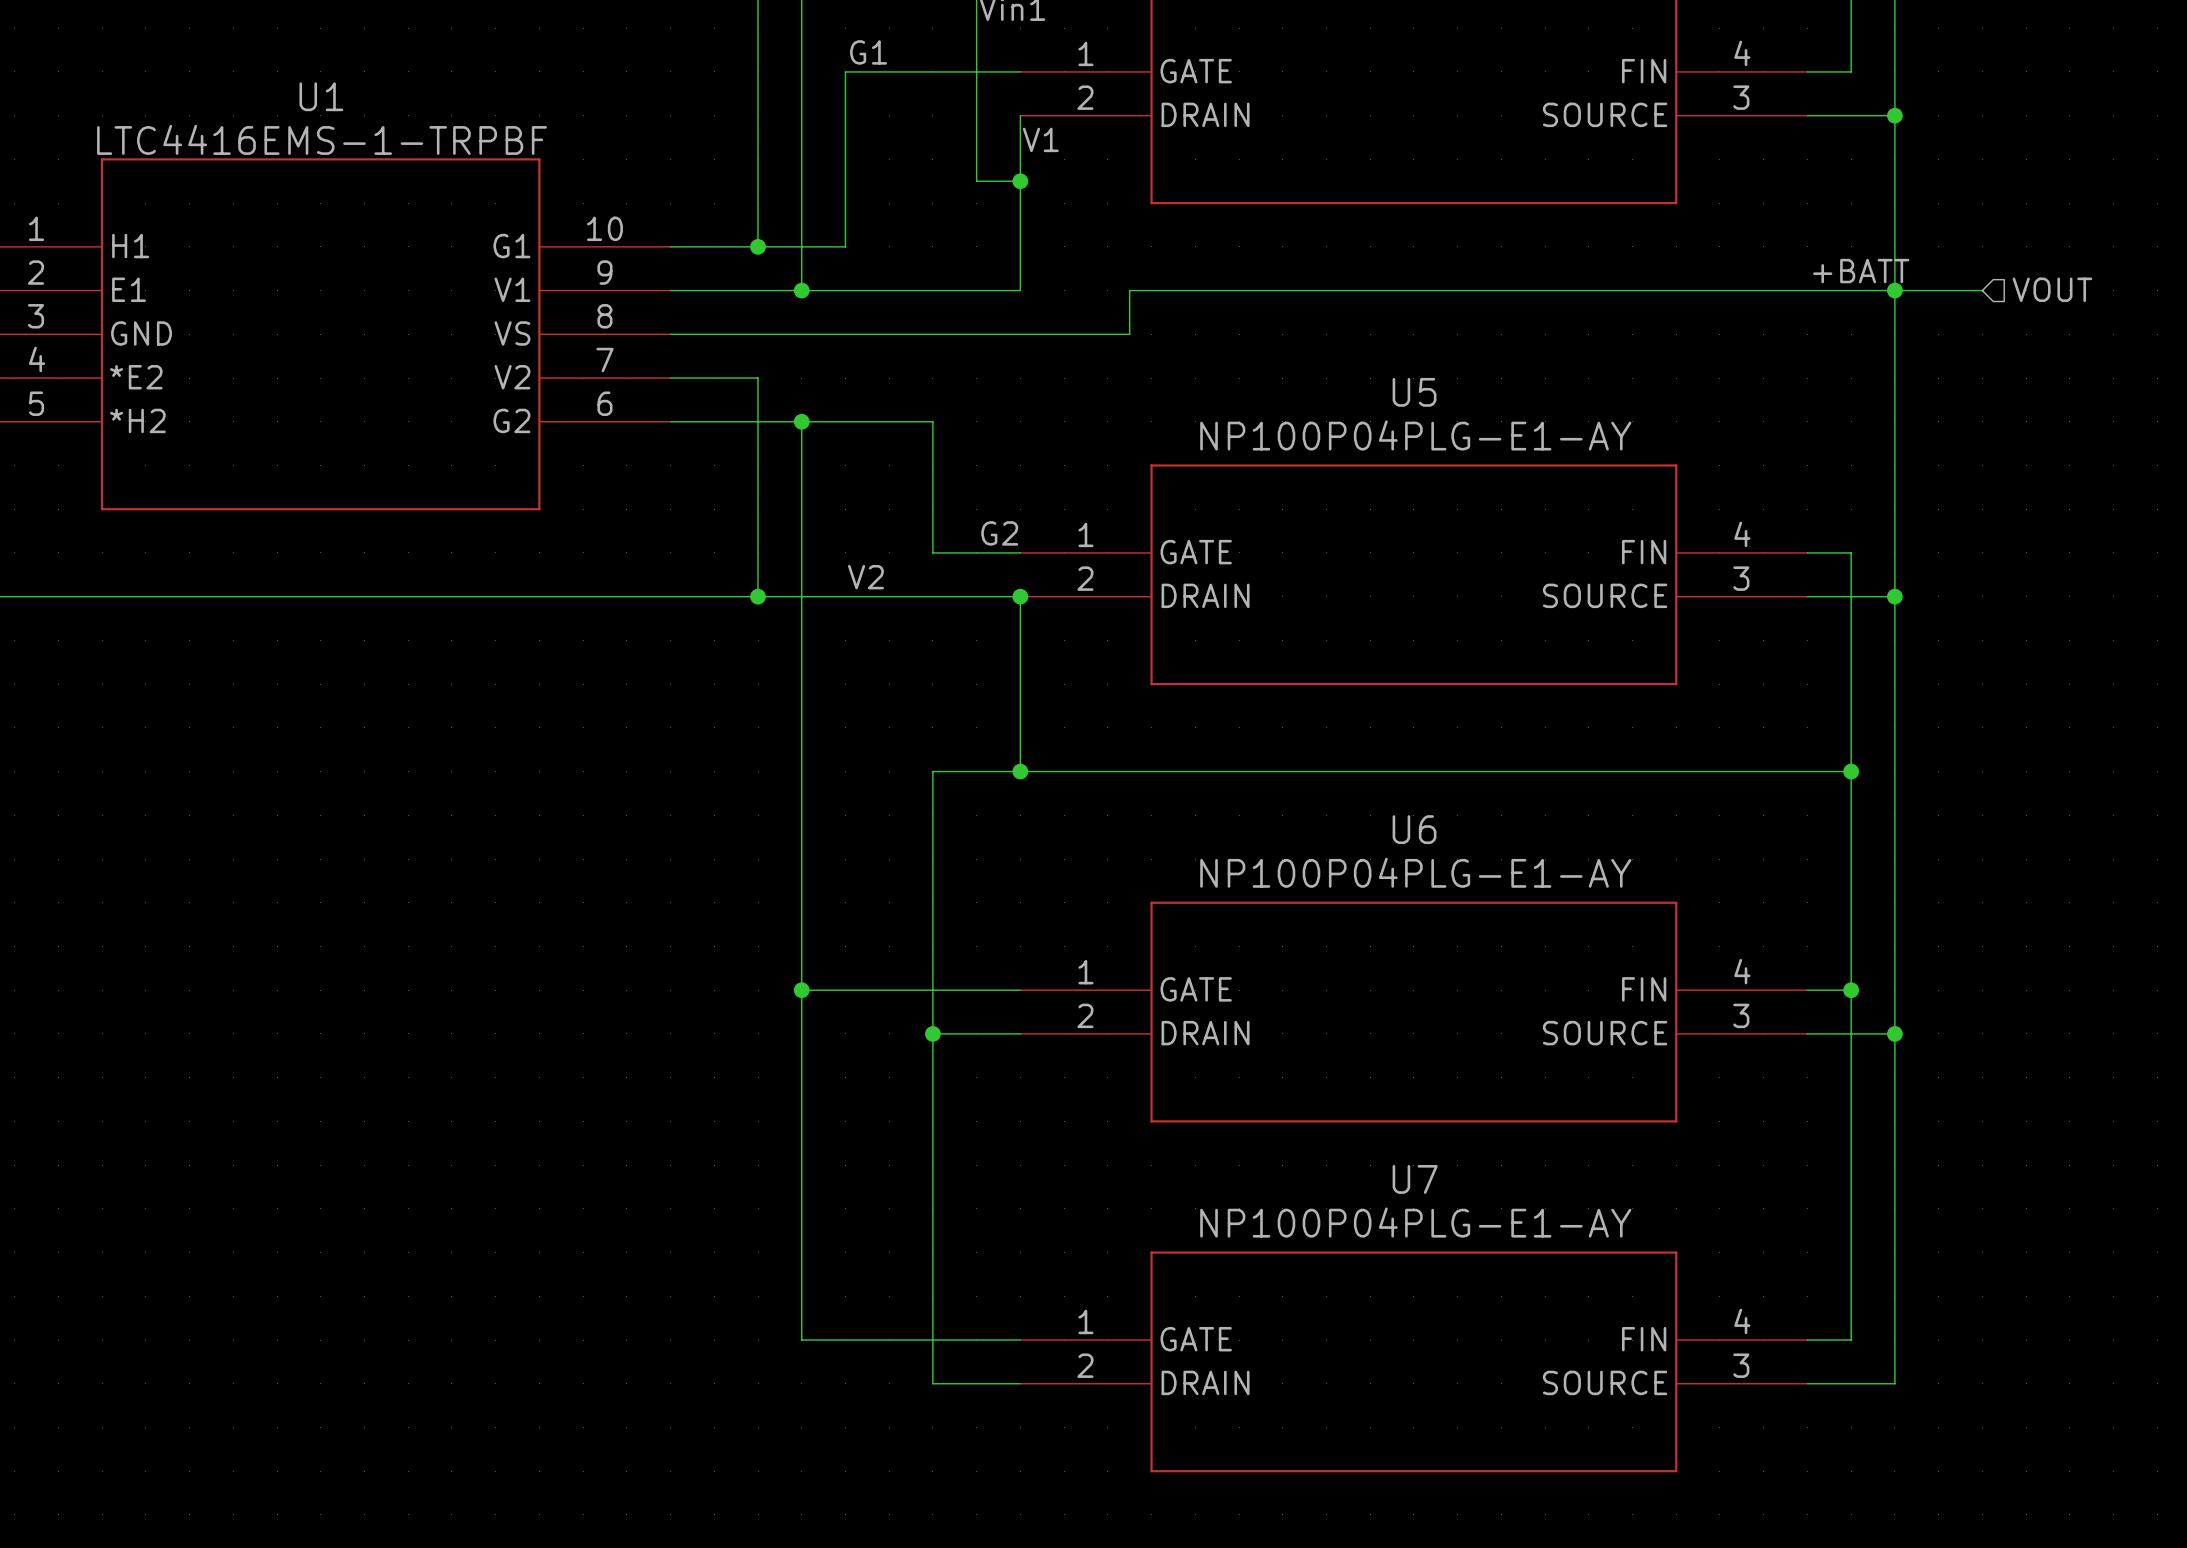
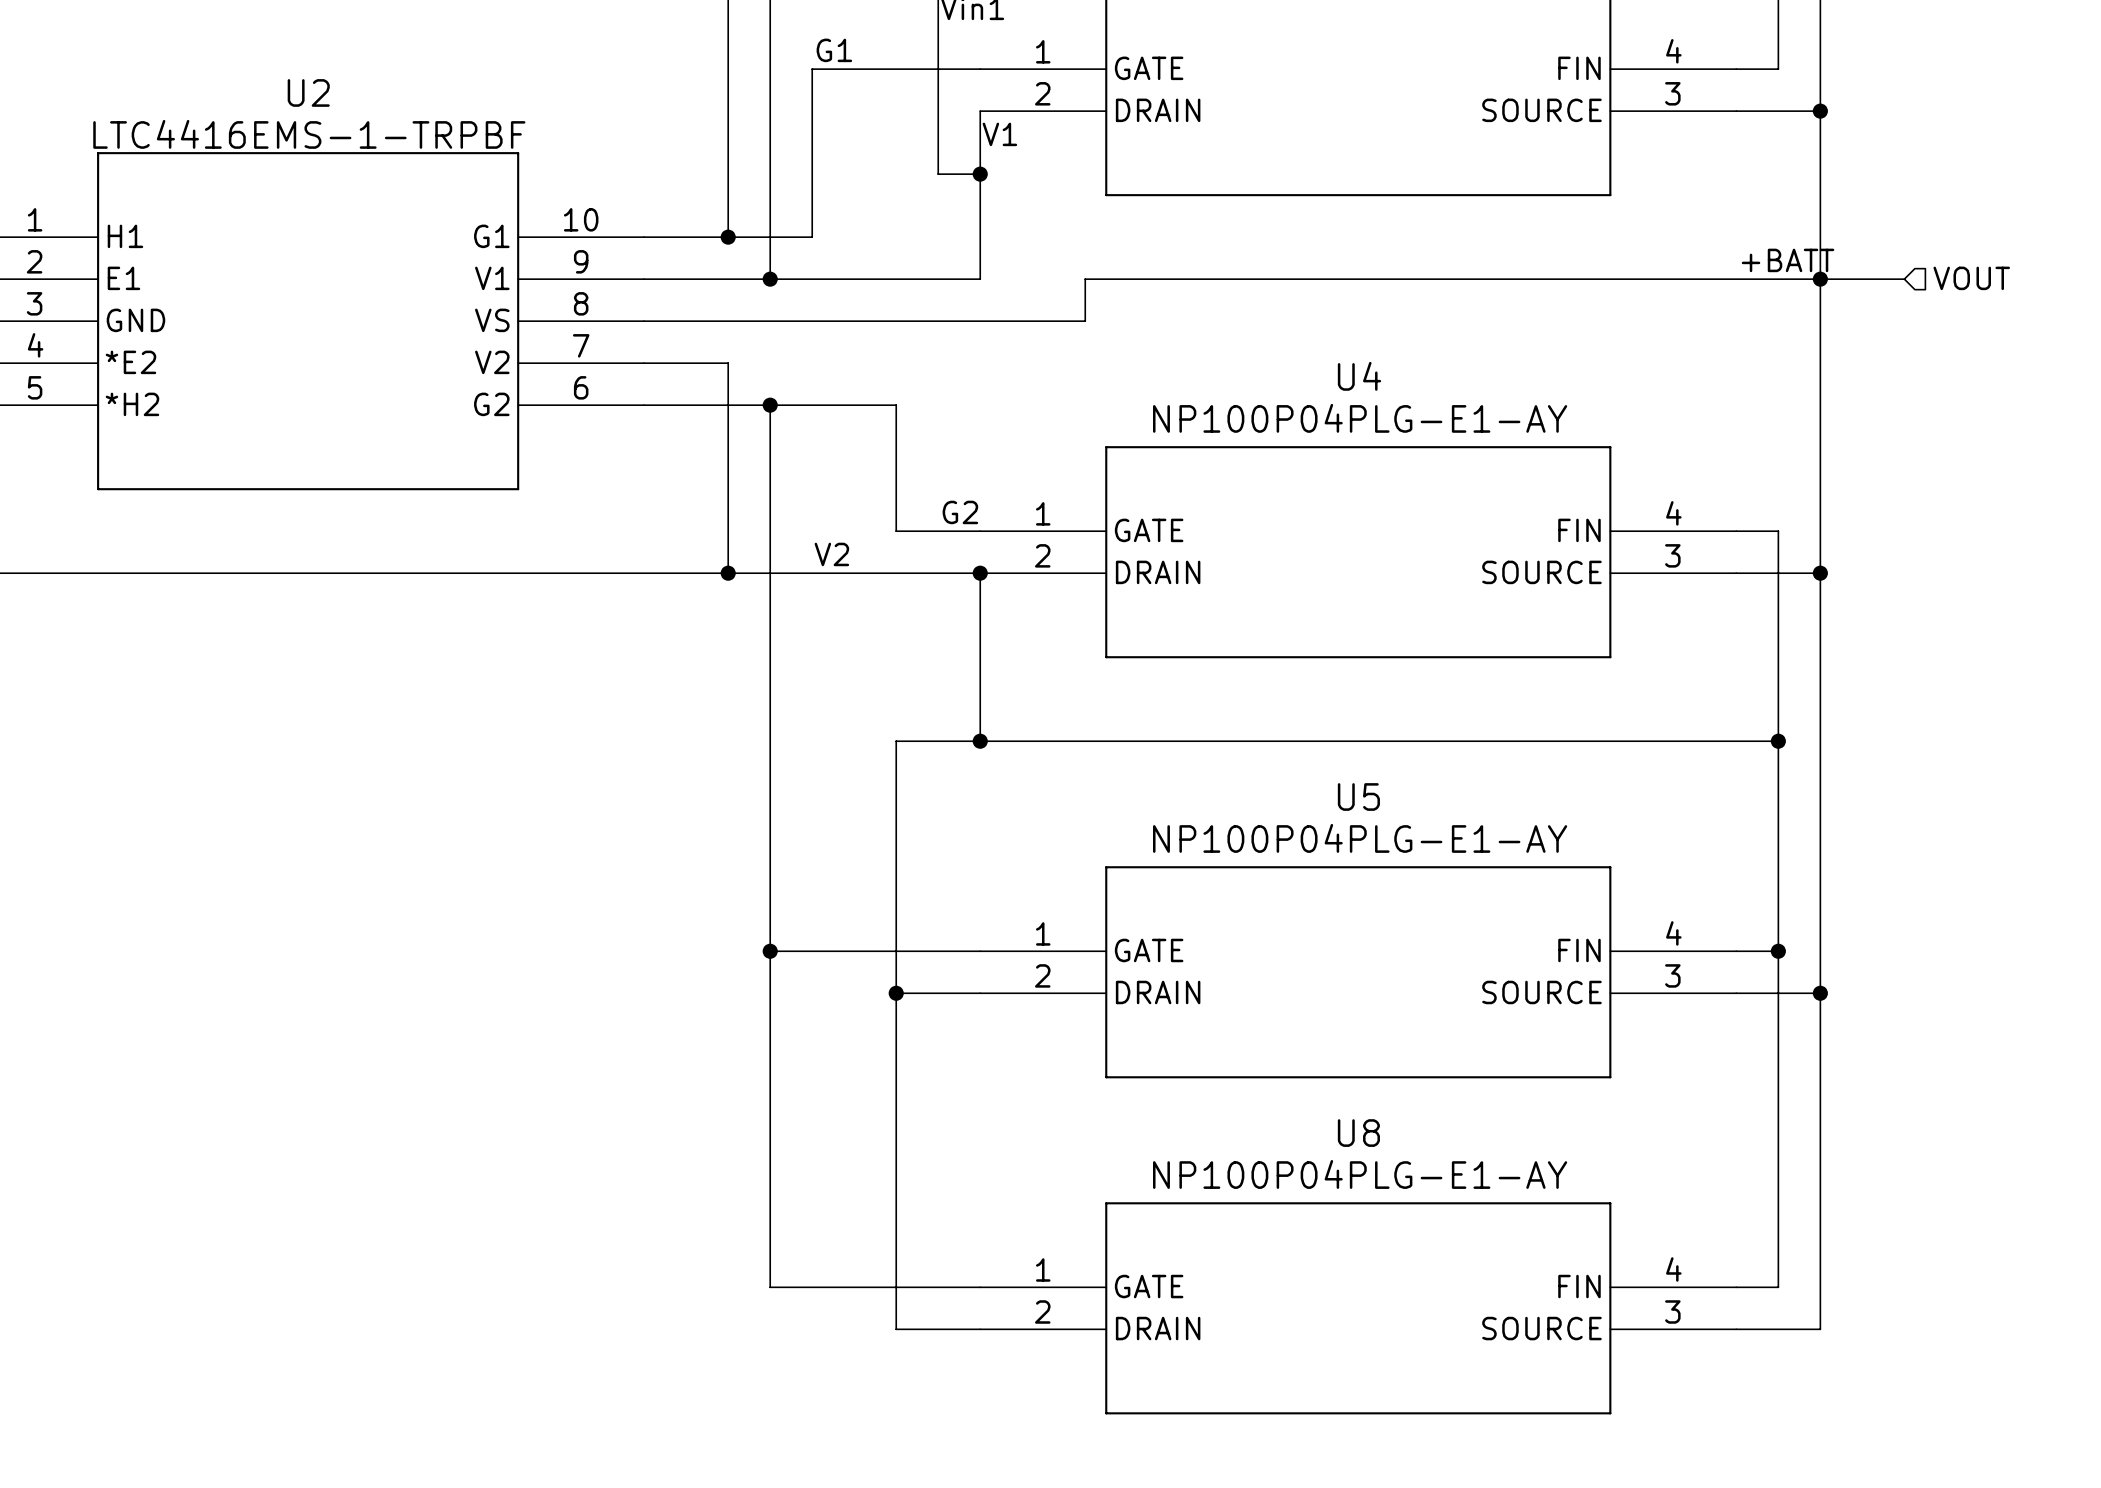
U1 name: U1 (321, 96) -> U2 (308, 92)
U5 name: U5 (1414, 392) -> U4 (1359, 376)
U6 name: U6 (1414, 829) -> U5 (1358, 796)
U7 name: U7 (1415, 1179) -> U8 (1358, 1133)

